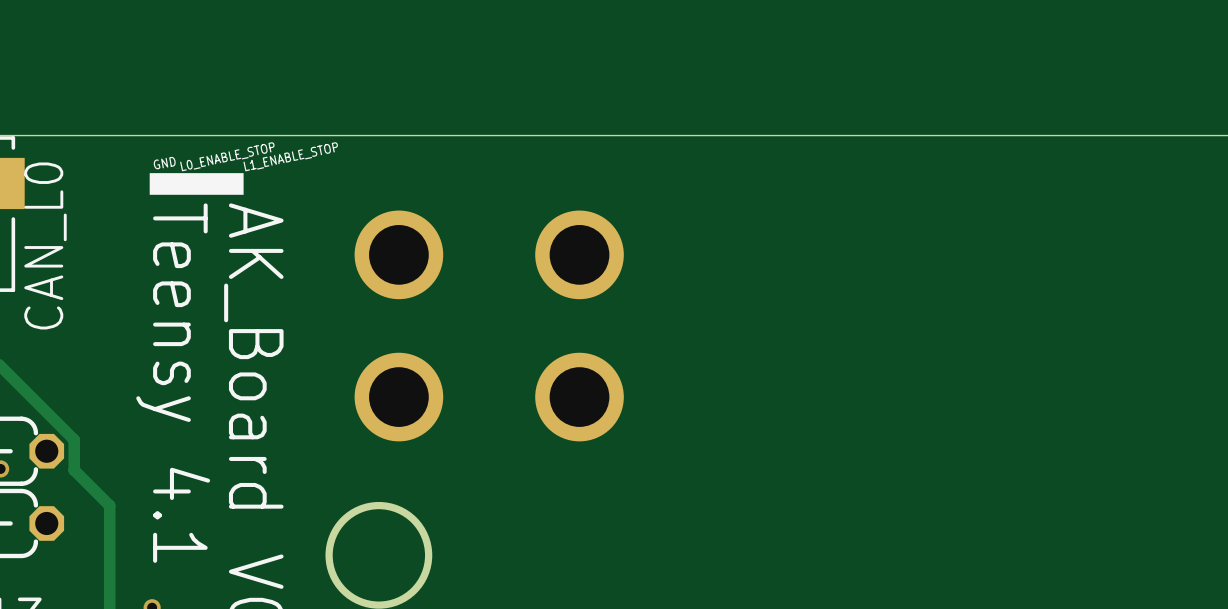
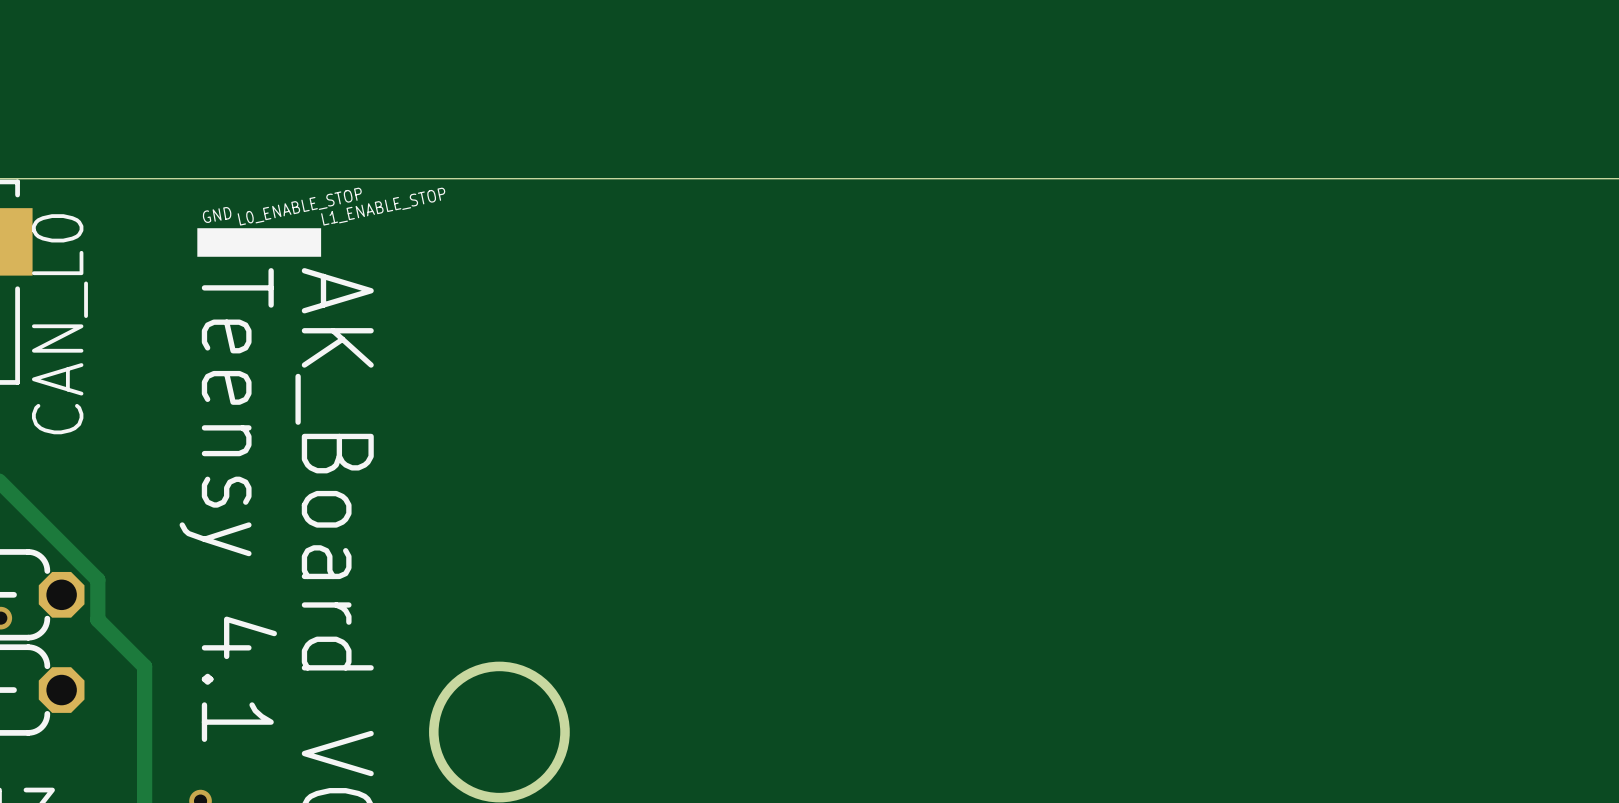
part: (398, 325) -> none
part: (579, 325) -> none

